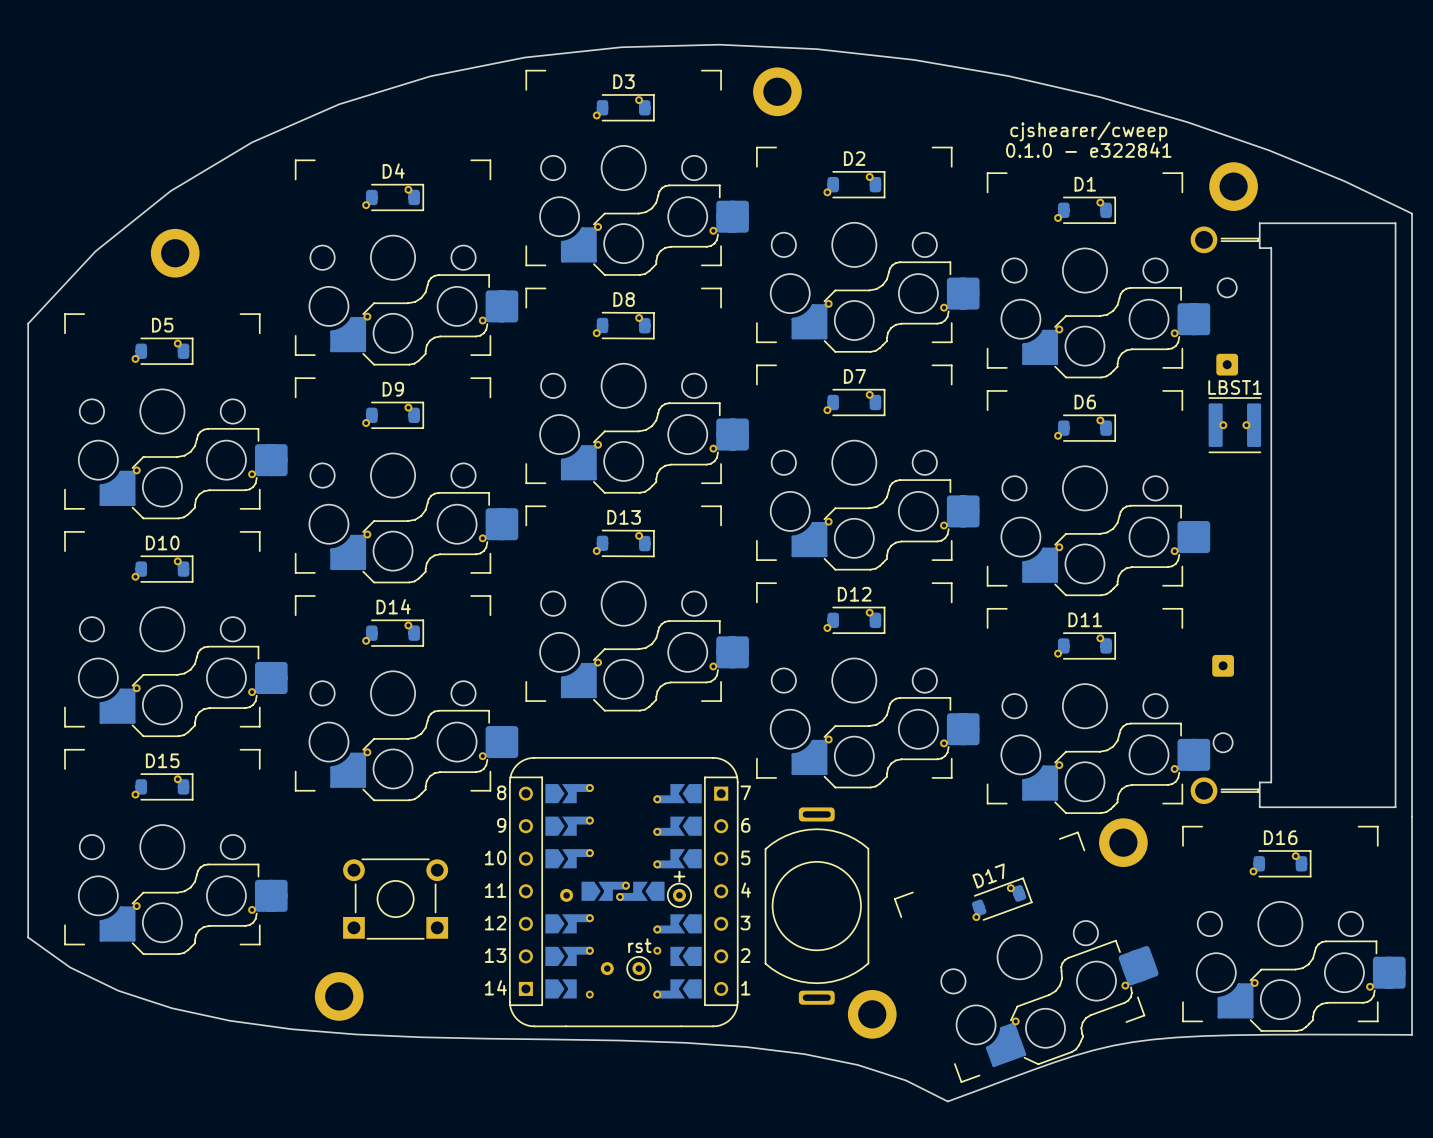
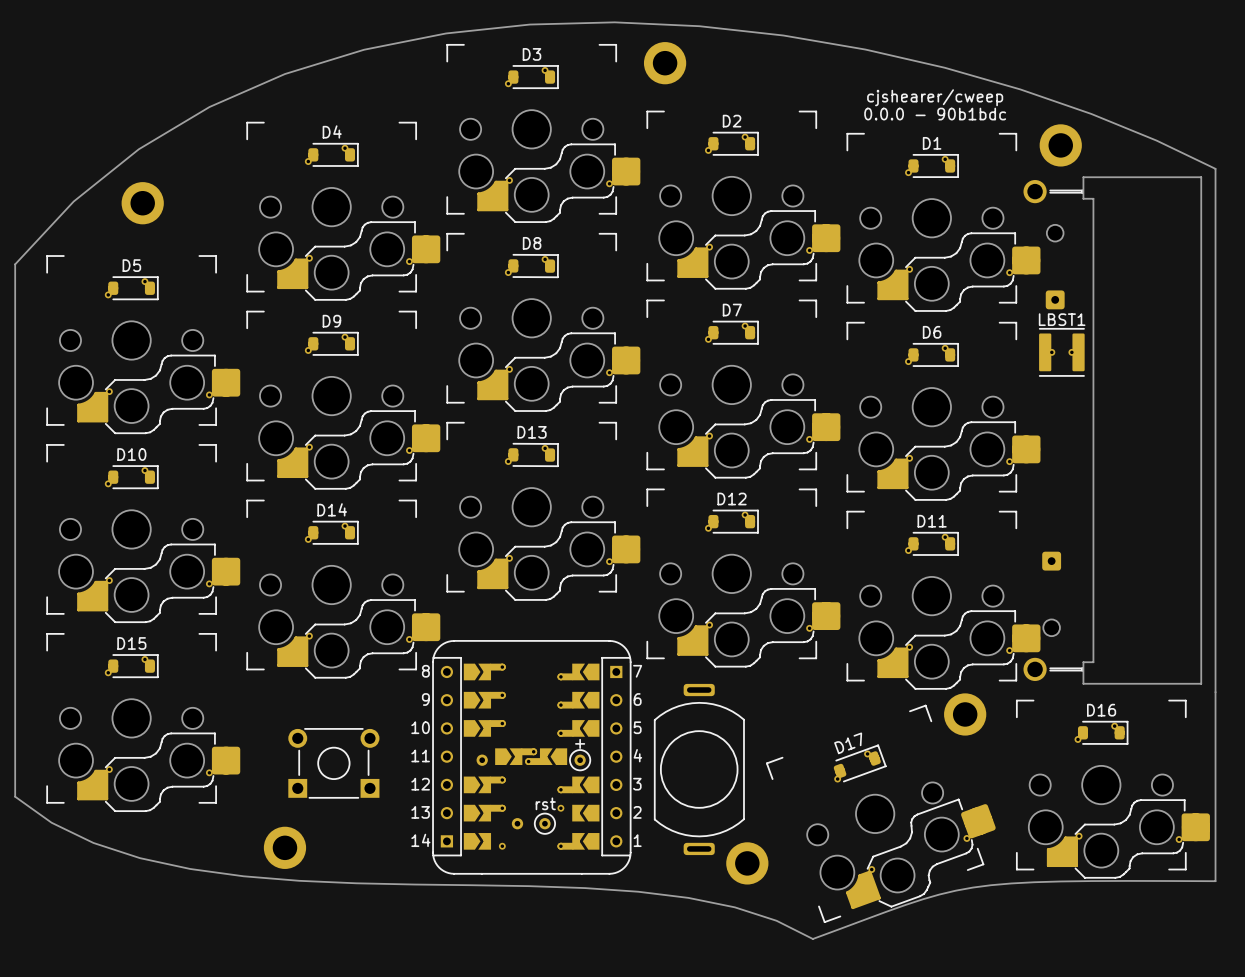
text: 0.1.0 - e322841 (1088, 150) -> 0.0.0 - 90b1bdc (935, 114)

